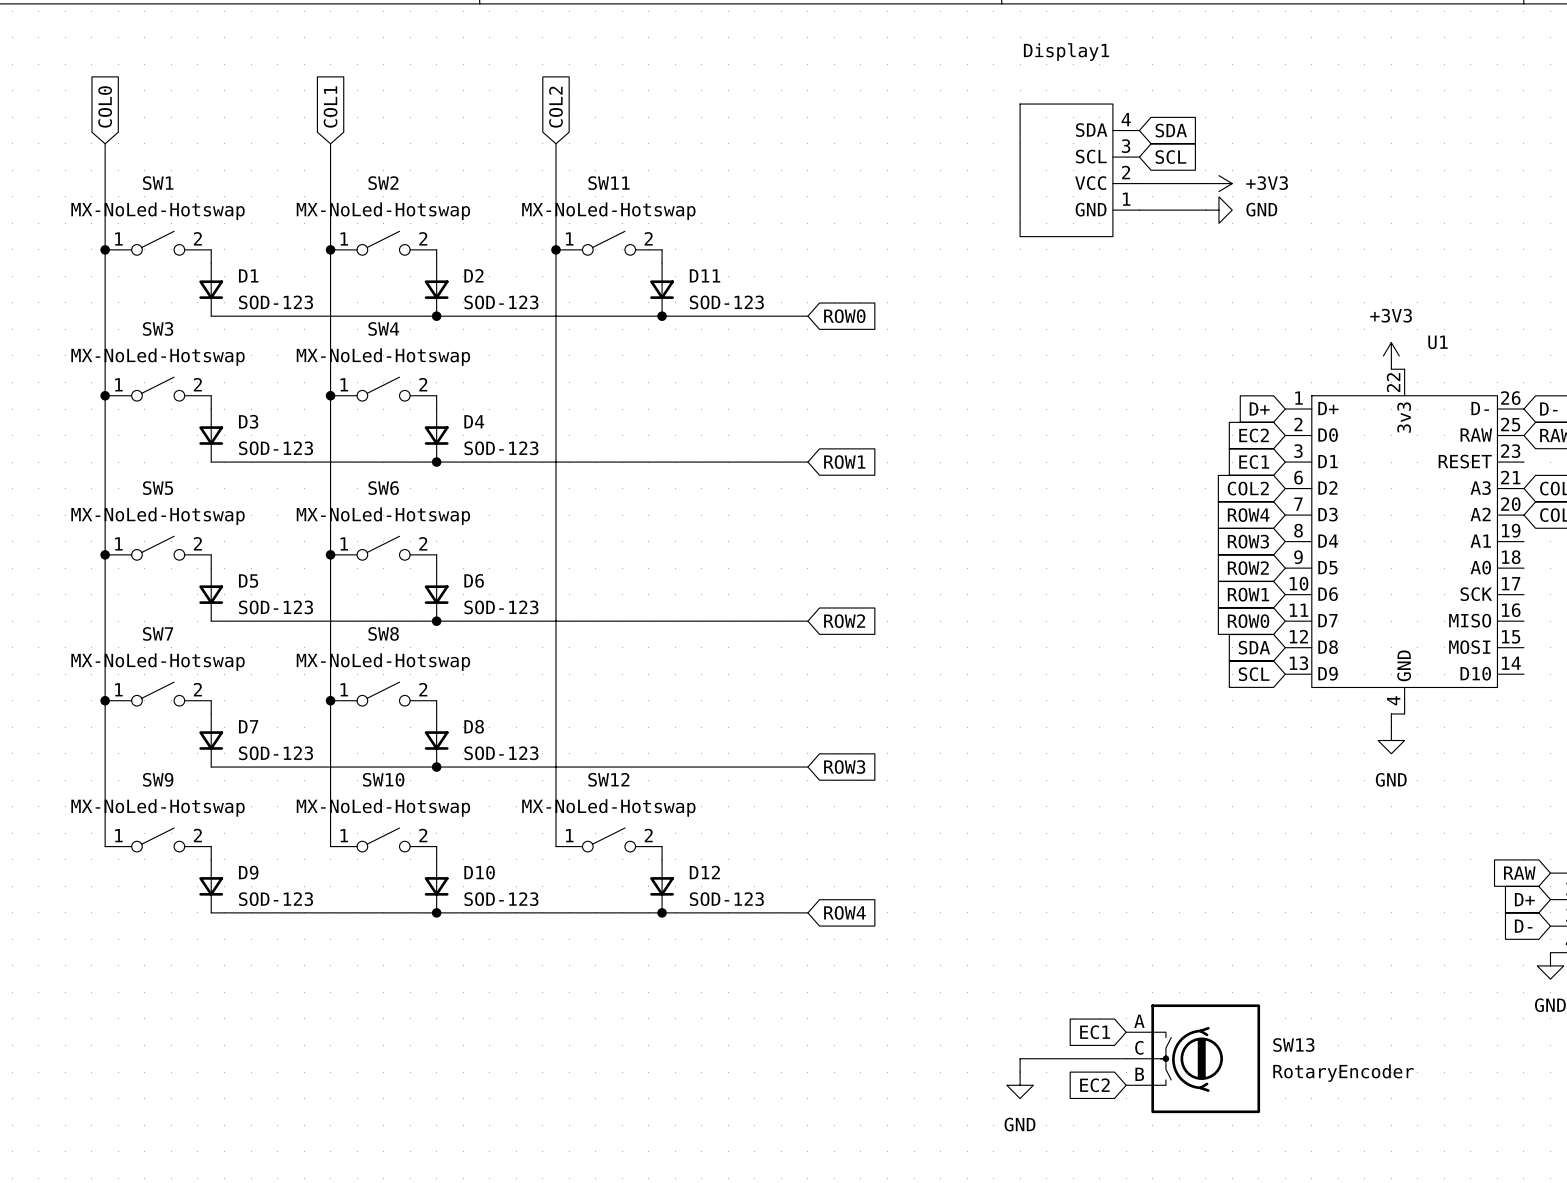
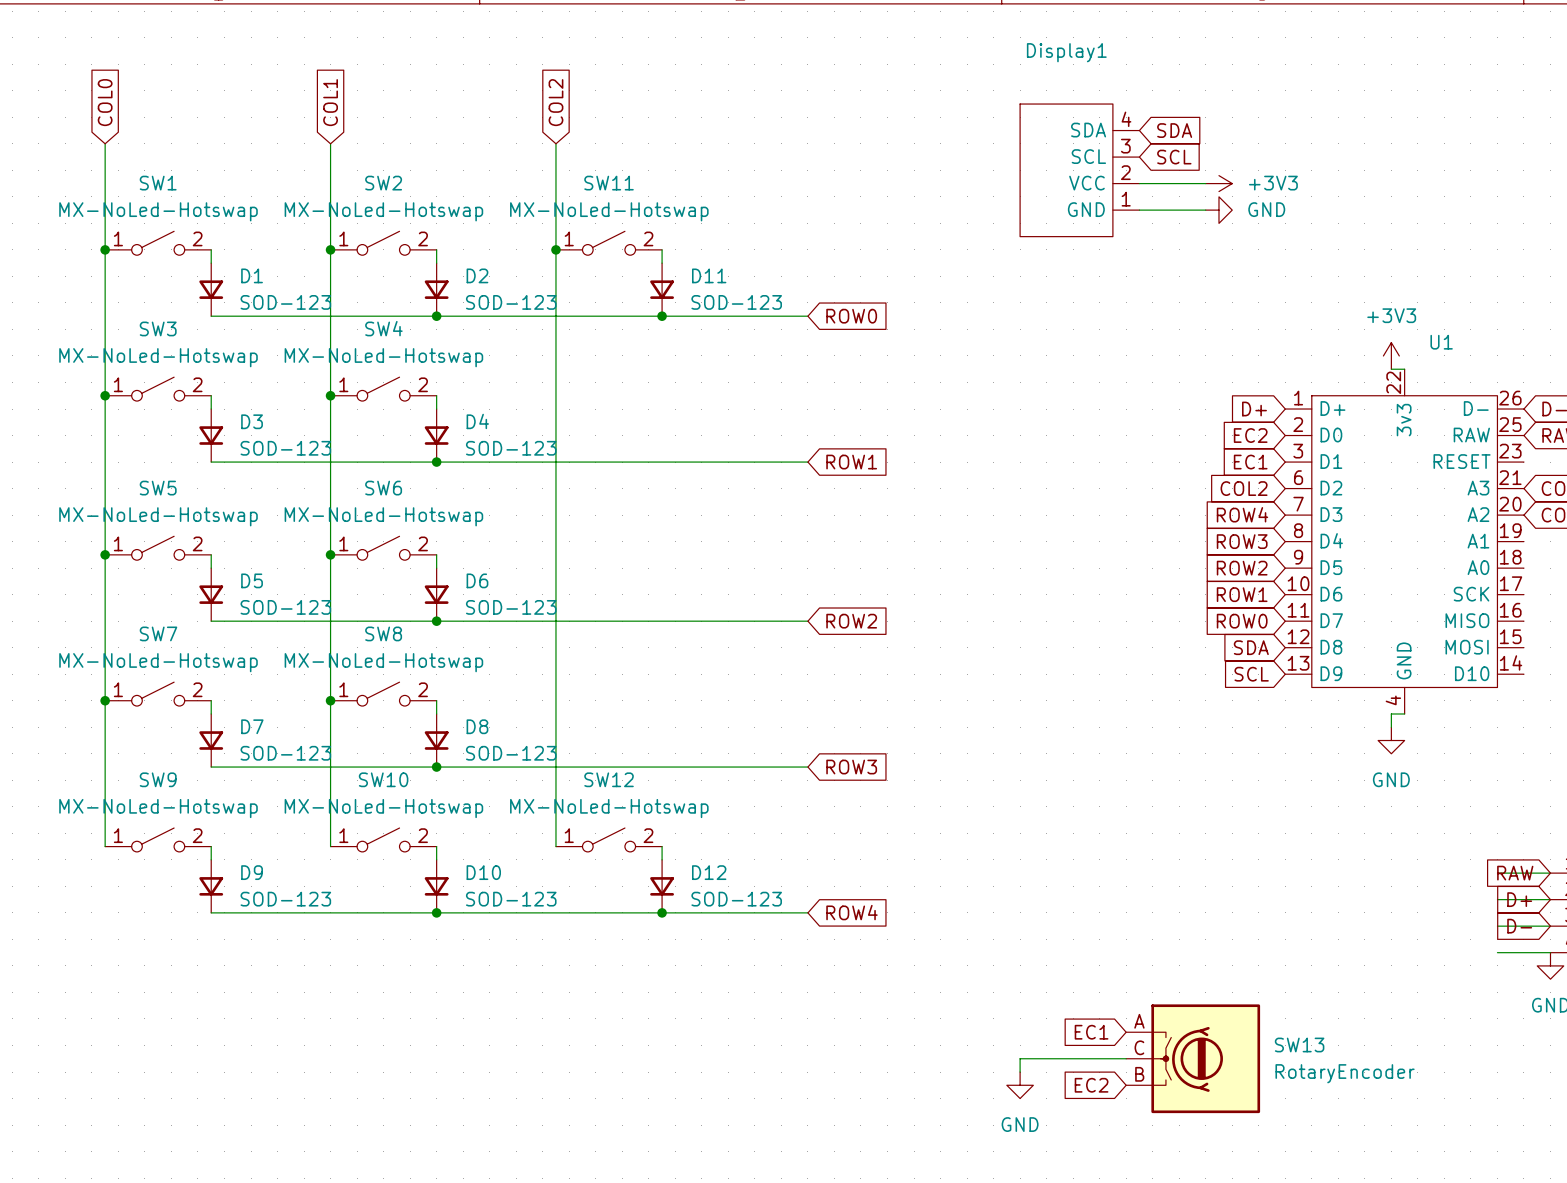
wire: none -> (1497, 873) (1550, 873)
wire: none -> (1497, 899) (1550, 899)
wire: none -> (1497, 926) (1550, 926)
wire: none -> (1497, 952) (1550, 952)

